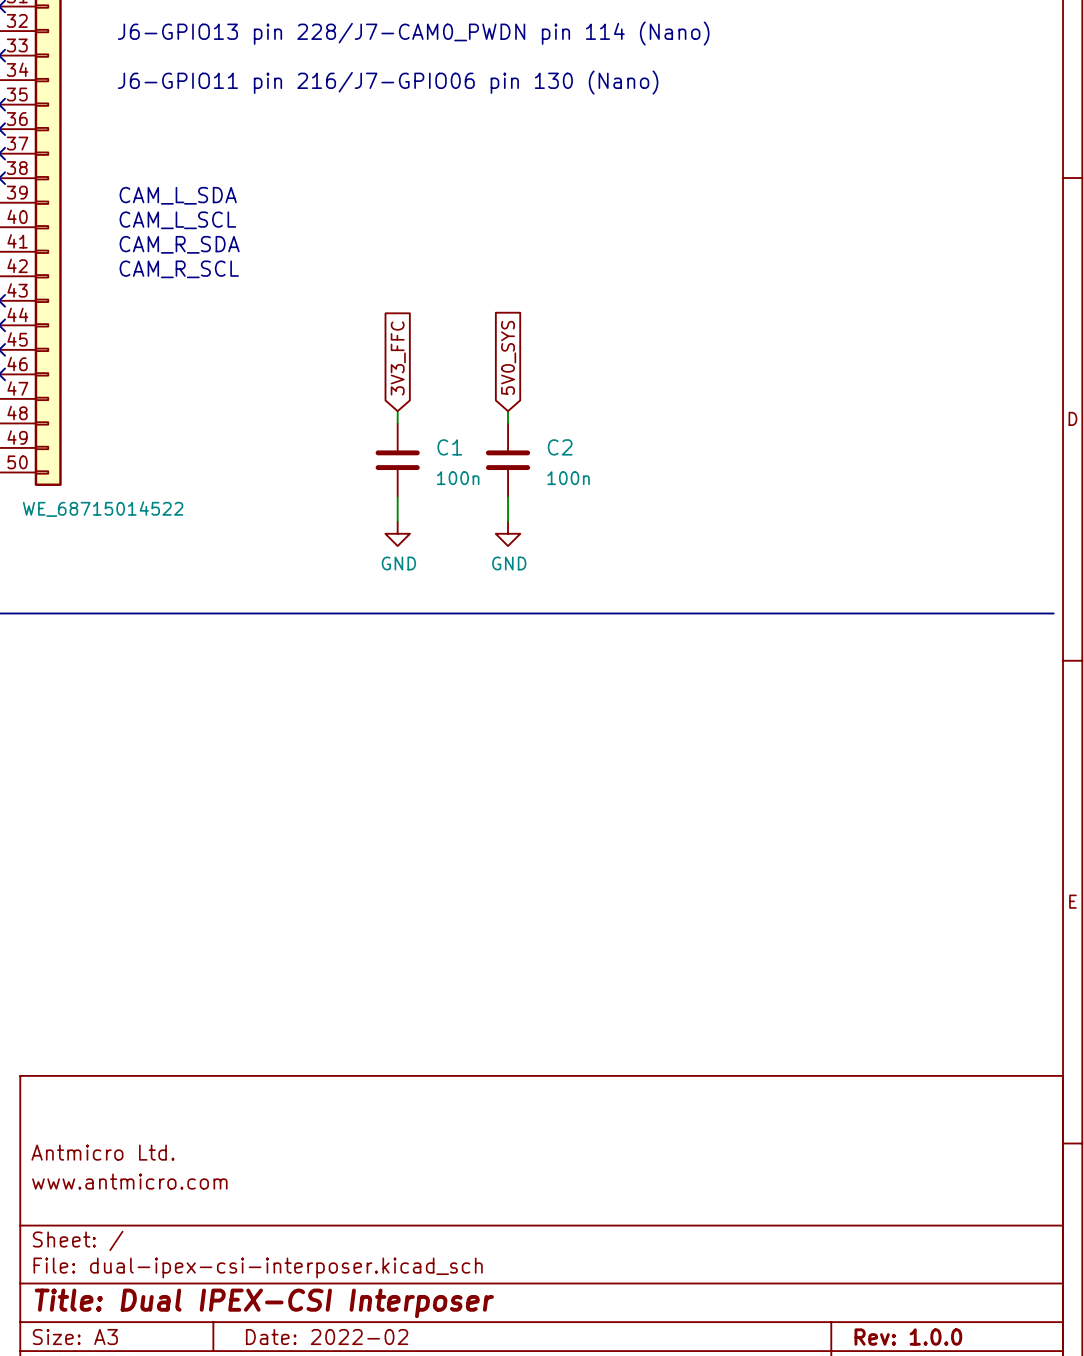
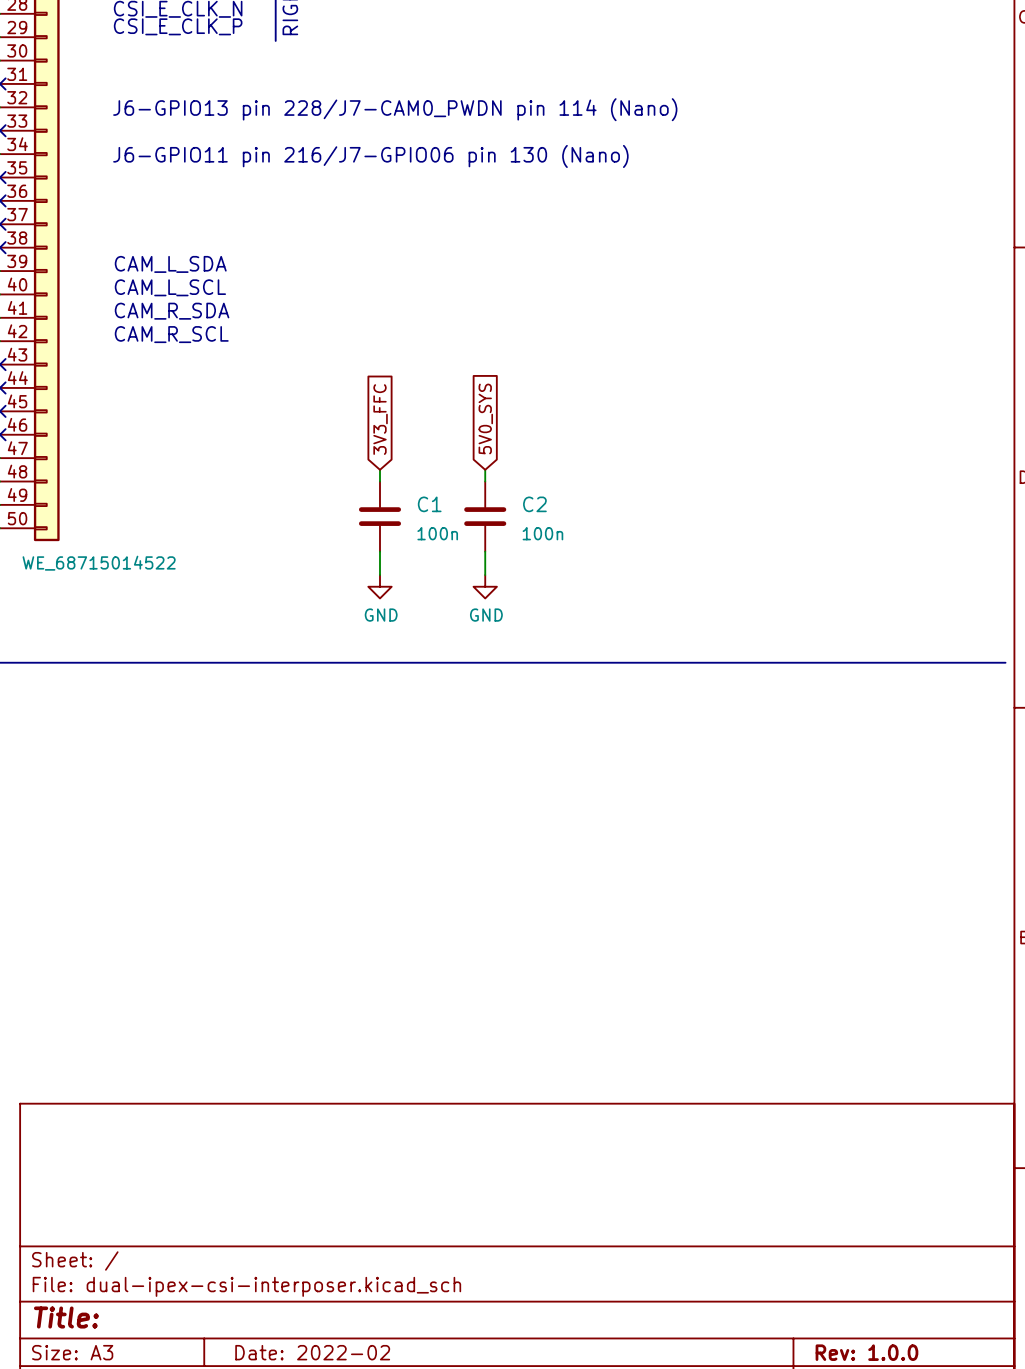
title block: Antmicro Ltd. (102, 1152) -> none
title block: www.antmicro.com (129, 1181) -> none
title block: Title: Dual IPEX-CSI Interposer (264, 1303) -> Title: (66, 1317)

